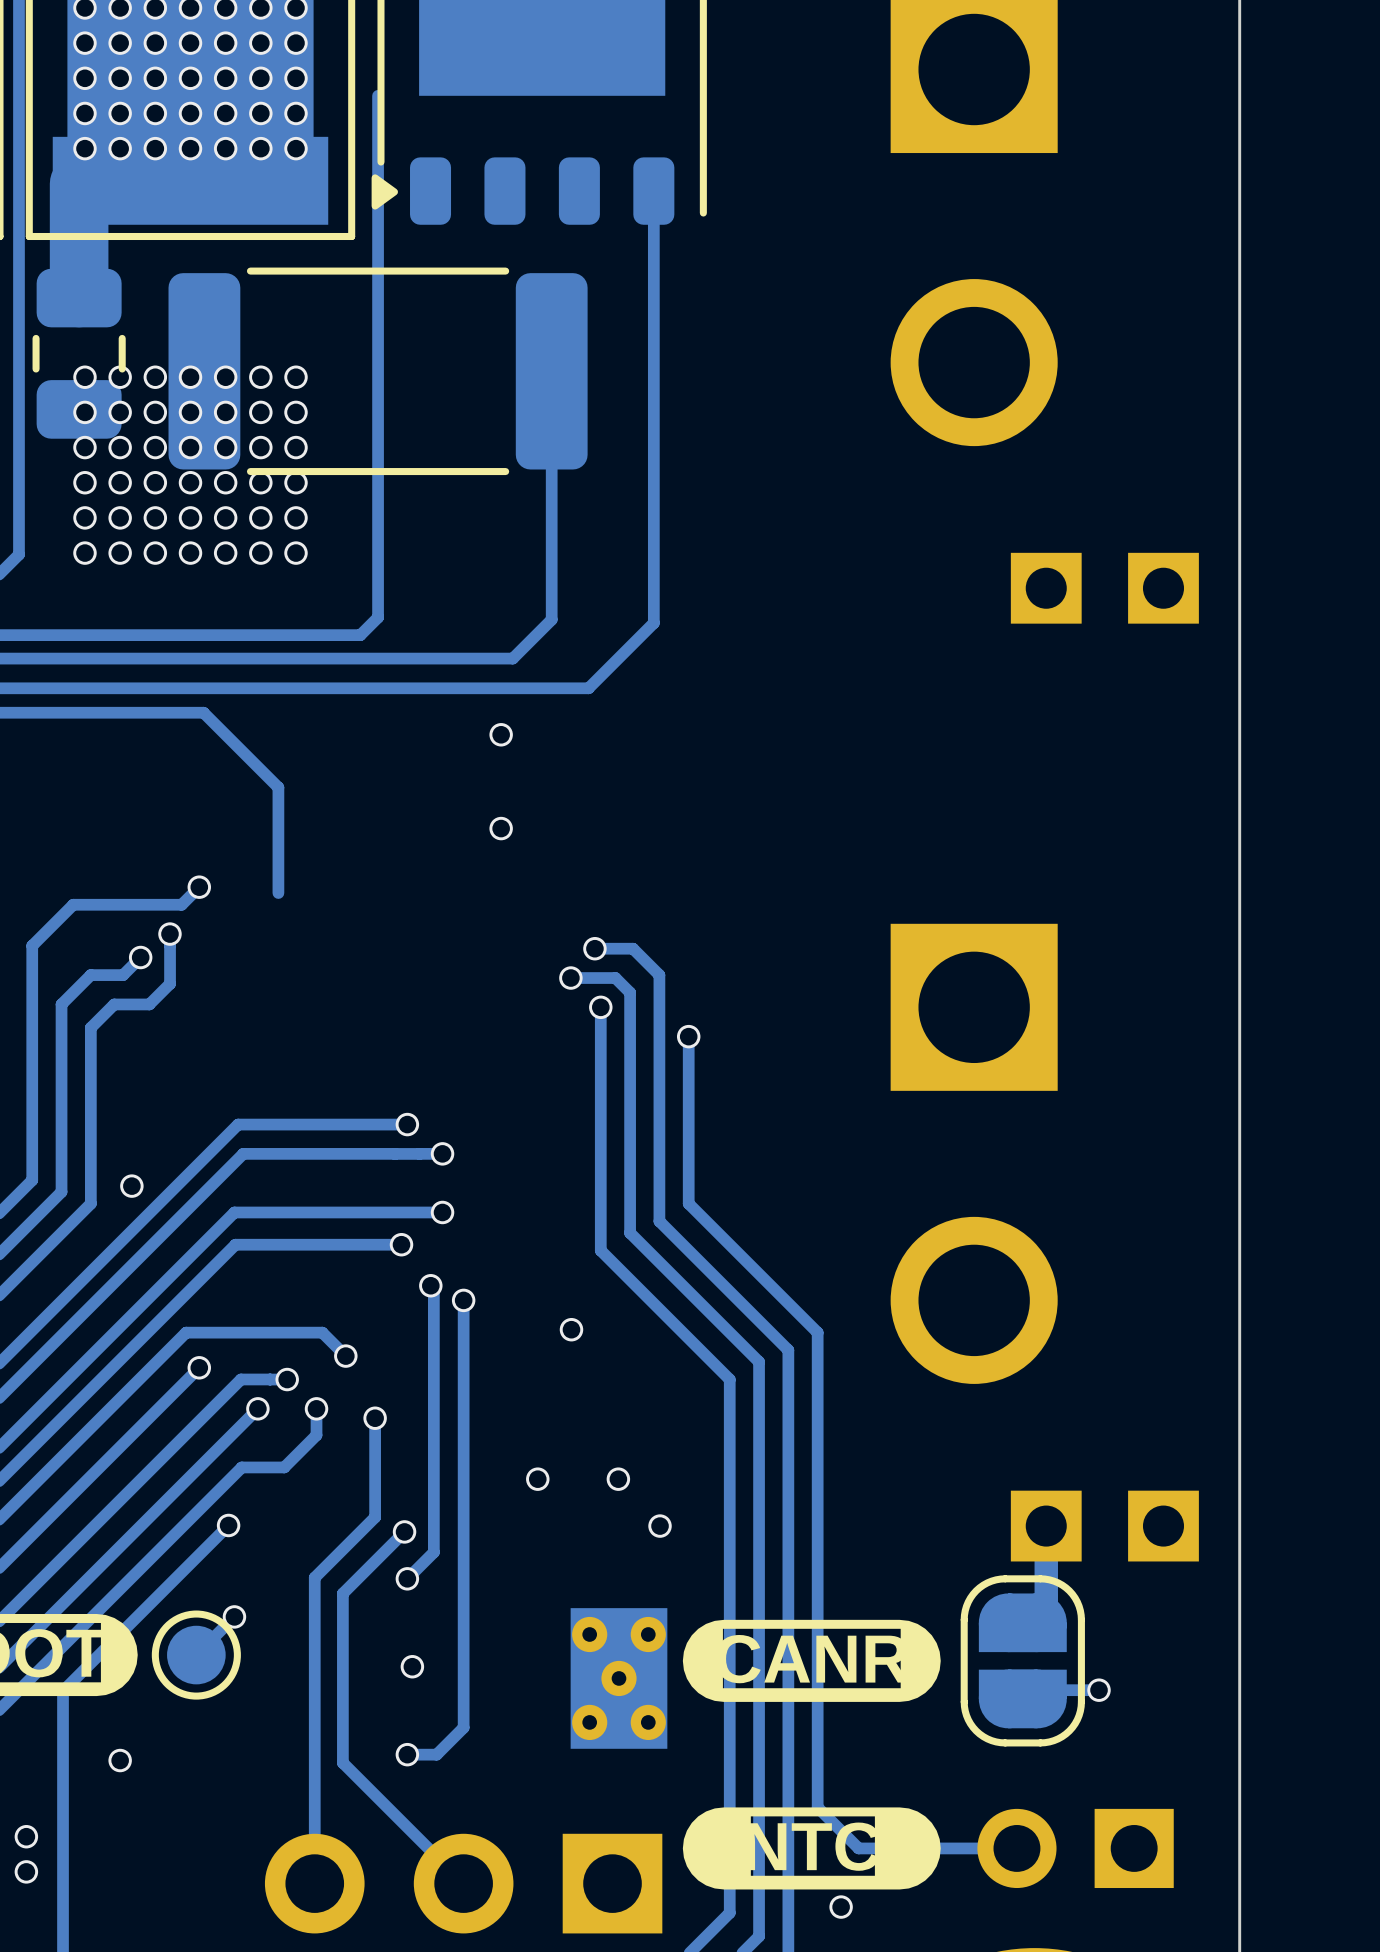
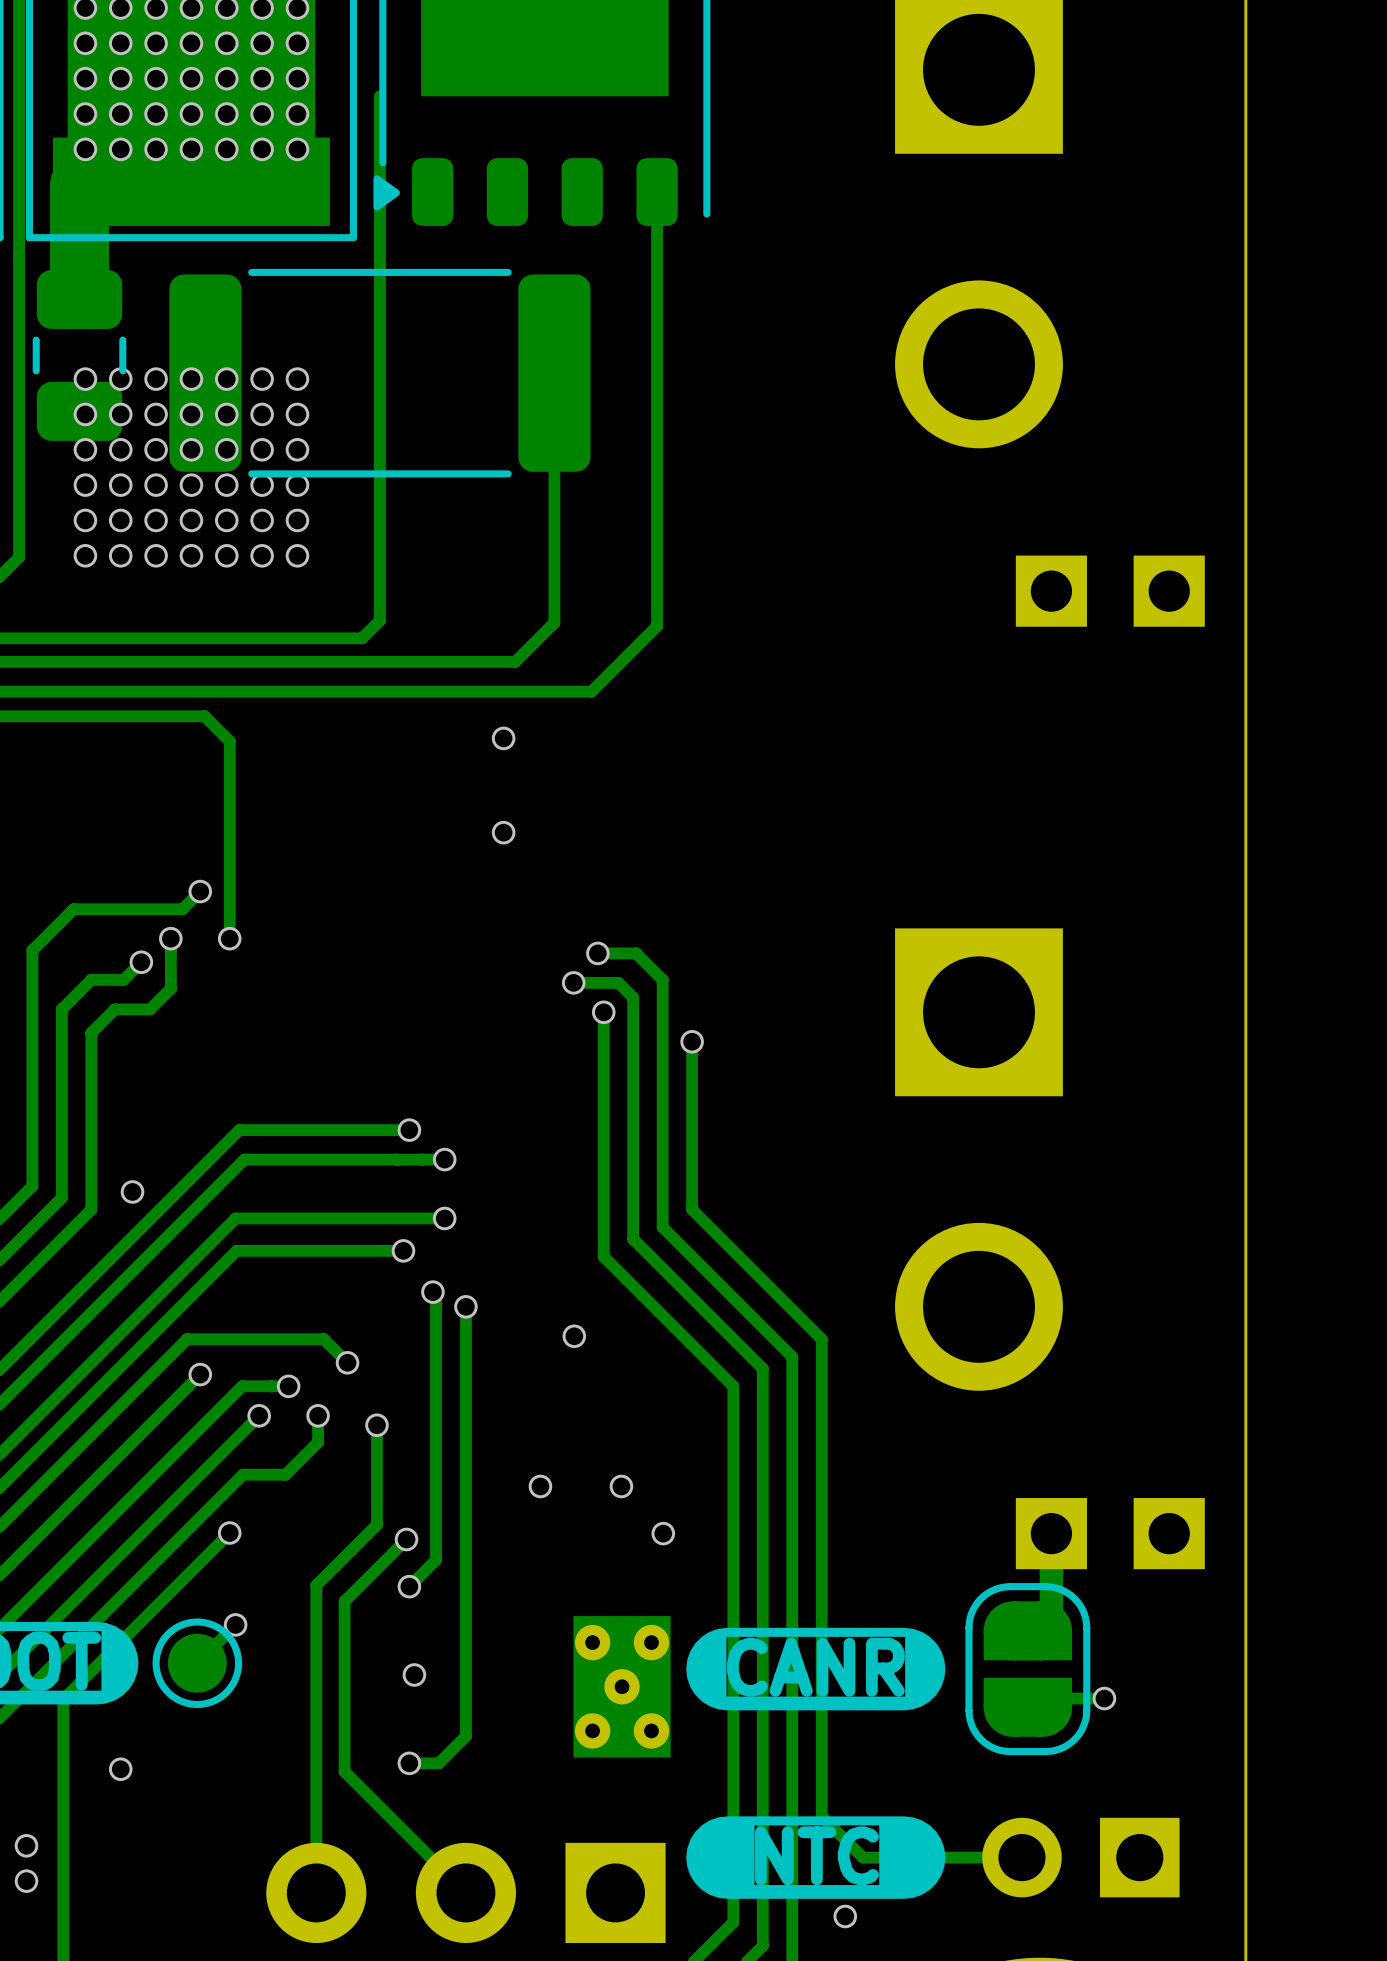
track: (228, 737) (278, 787) (278, 893) -> (229, 741) (229, 938)
via: none -> (229, 938)

